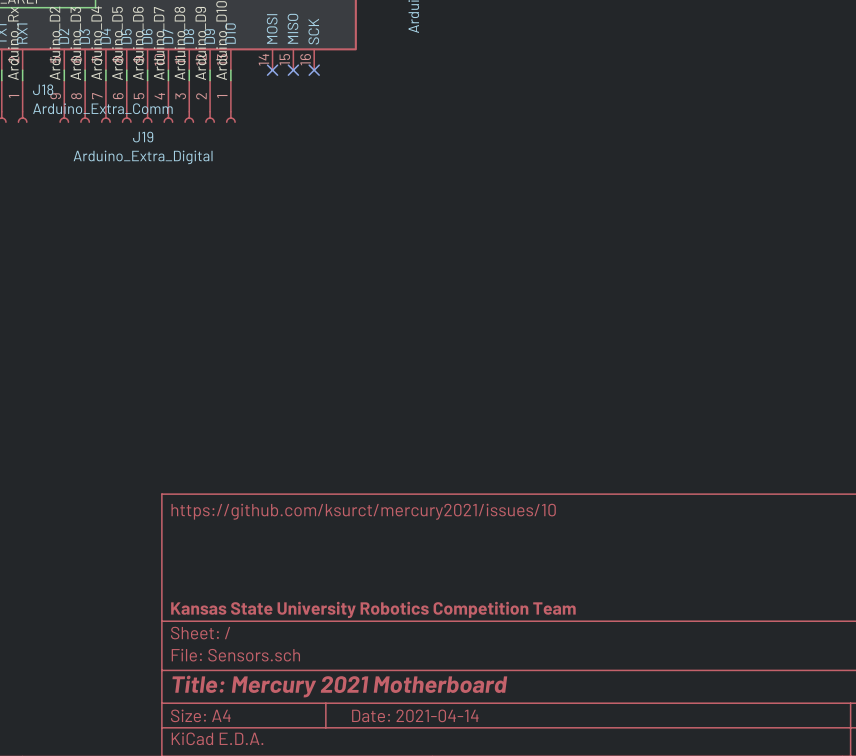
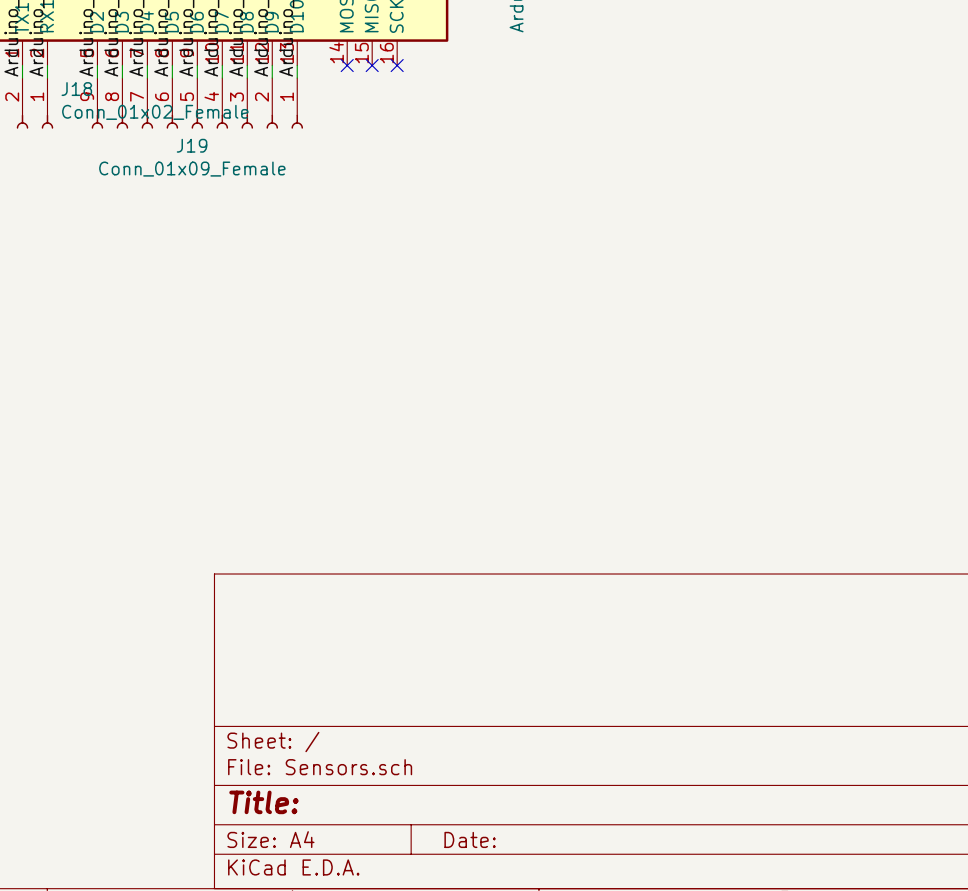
J18 value: Arduino_Extra_Comm (102, 108) -> Conn_01x02_Female (155, 112)
J19 value: Arduino_Extra_Digital (143, 157) -> Conn_01x09_Female (192, 169)
title block: https://github.com/ksurct/mercury2021/issues/10 (363, 511) -> none
title block: Kansas State University Robotics Competition Team (373, 609) -> none
title block: Title: Mercury 2021 Motherboard (339, 686) -> Title: (263, 802)
title block: Date: 2021-04-14 (415, 715) -> Date: (470, 839)

